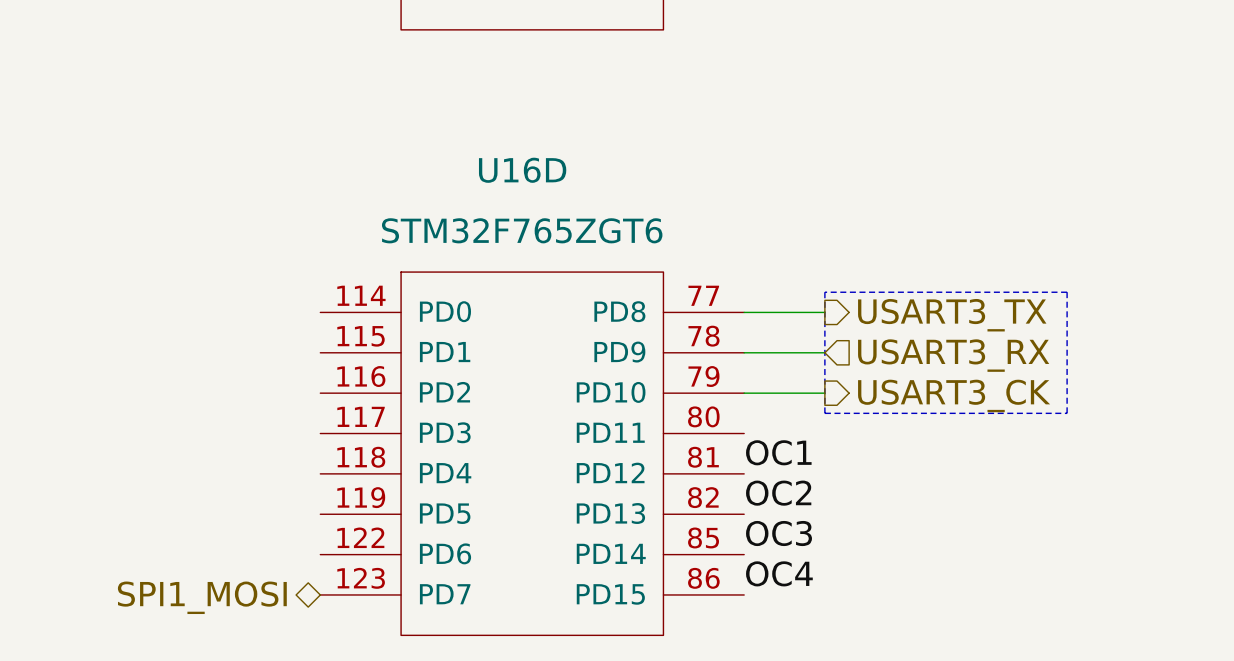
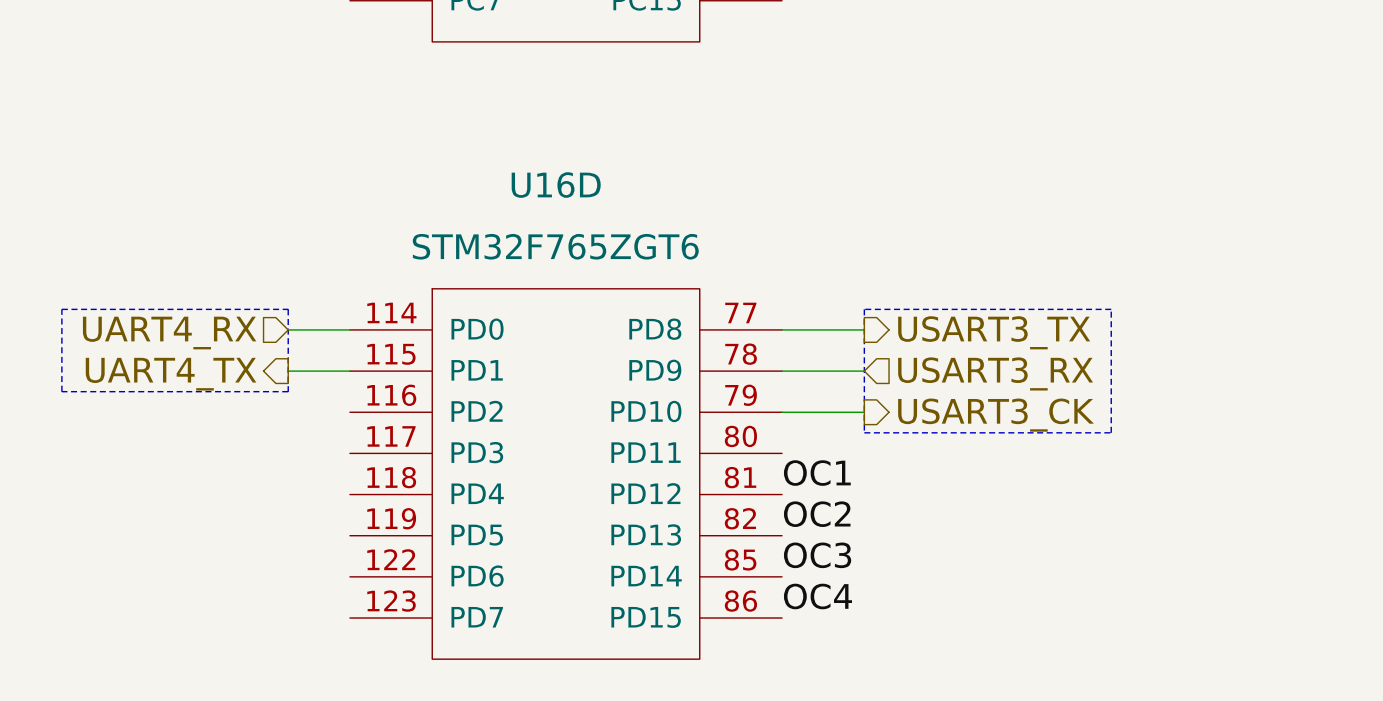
line: none -> (61, 309) (61, 391) (288, 391) (288, 309) (61, 309)
wire: none -> (288, 329) (349, 329)
hierarchical label: none -> UART4_RX (169, 333)
wire: none -> (288, 371) (349, 371)
hierarchical label: none -> UART4_TX (171, 374)
hierarchical label: SPI1_MOSI (202, 597) -> none

